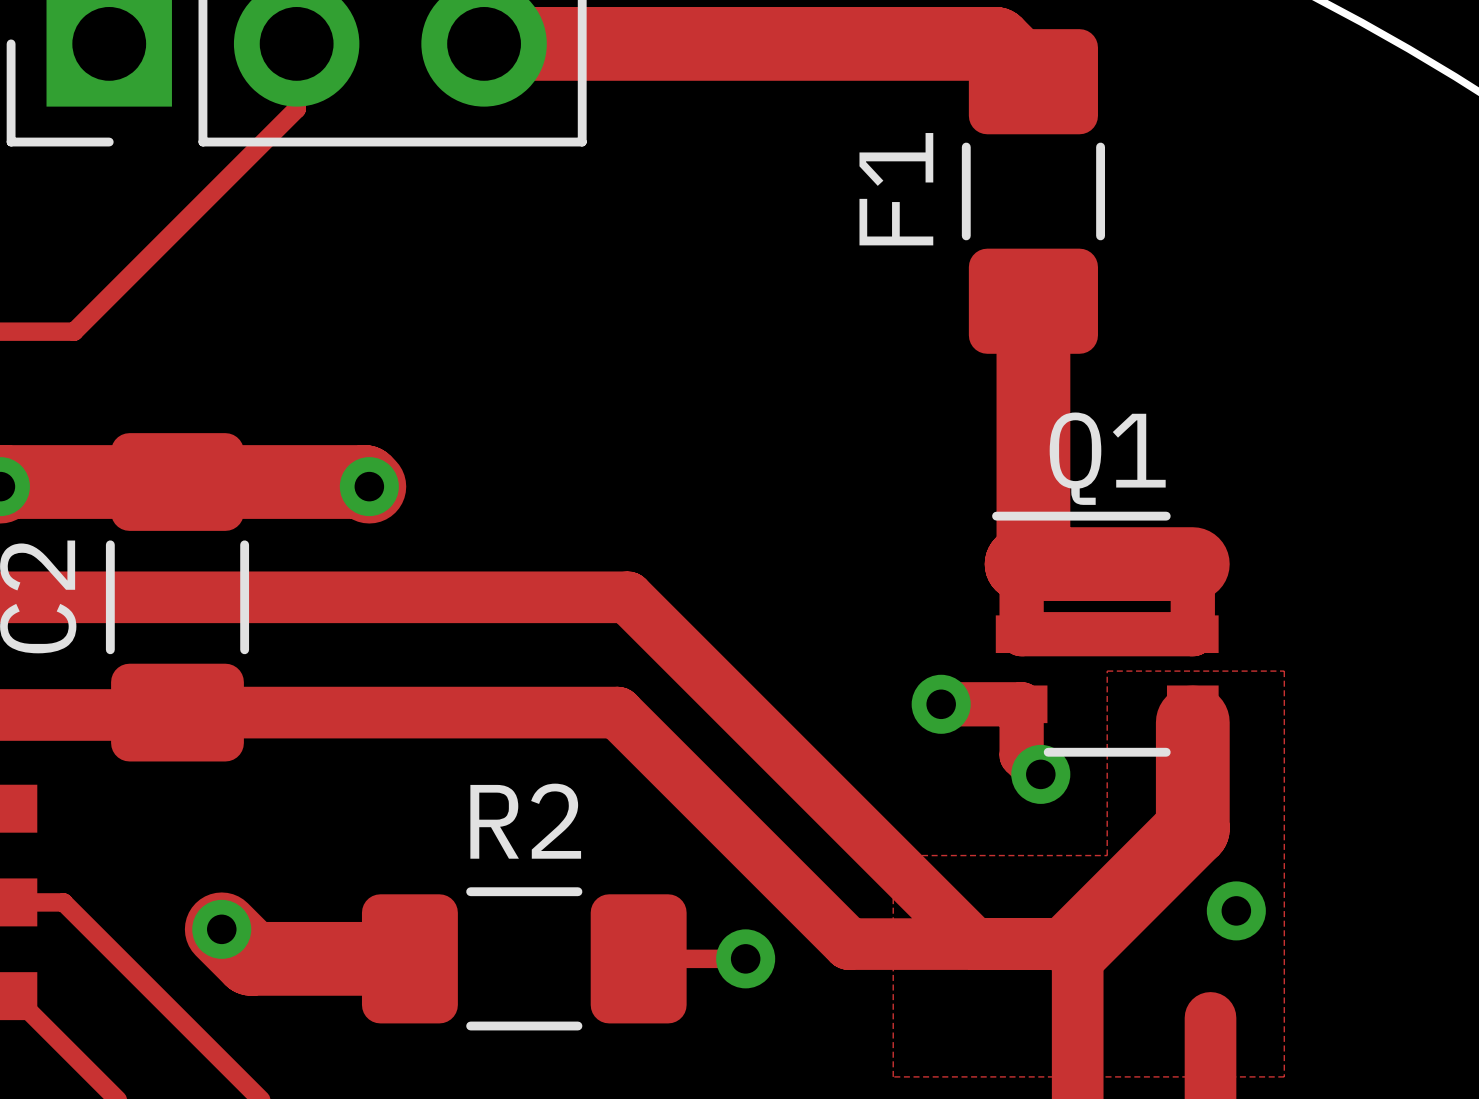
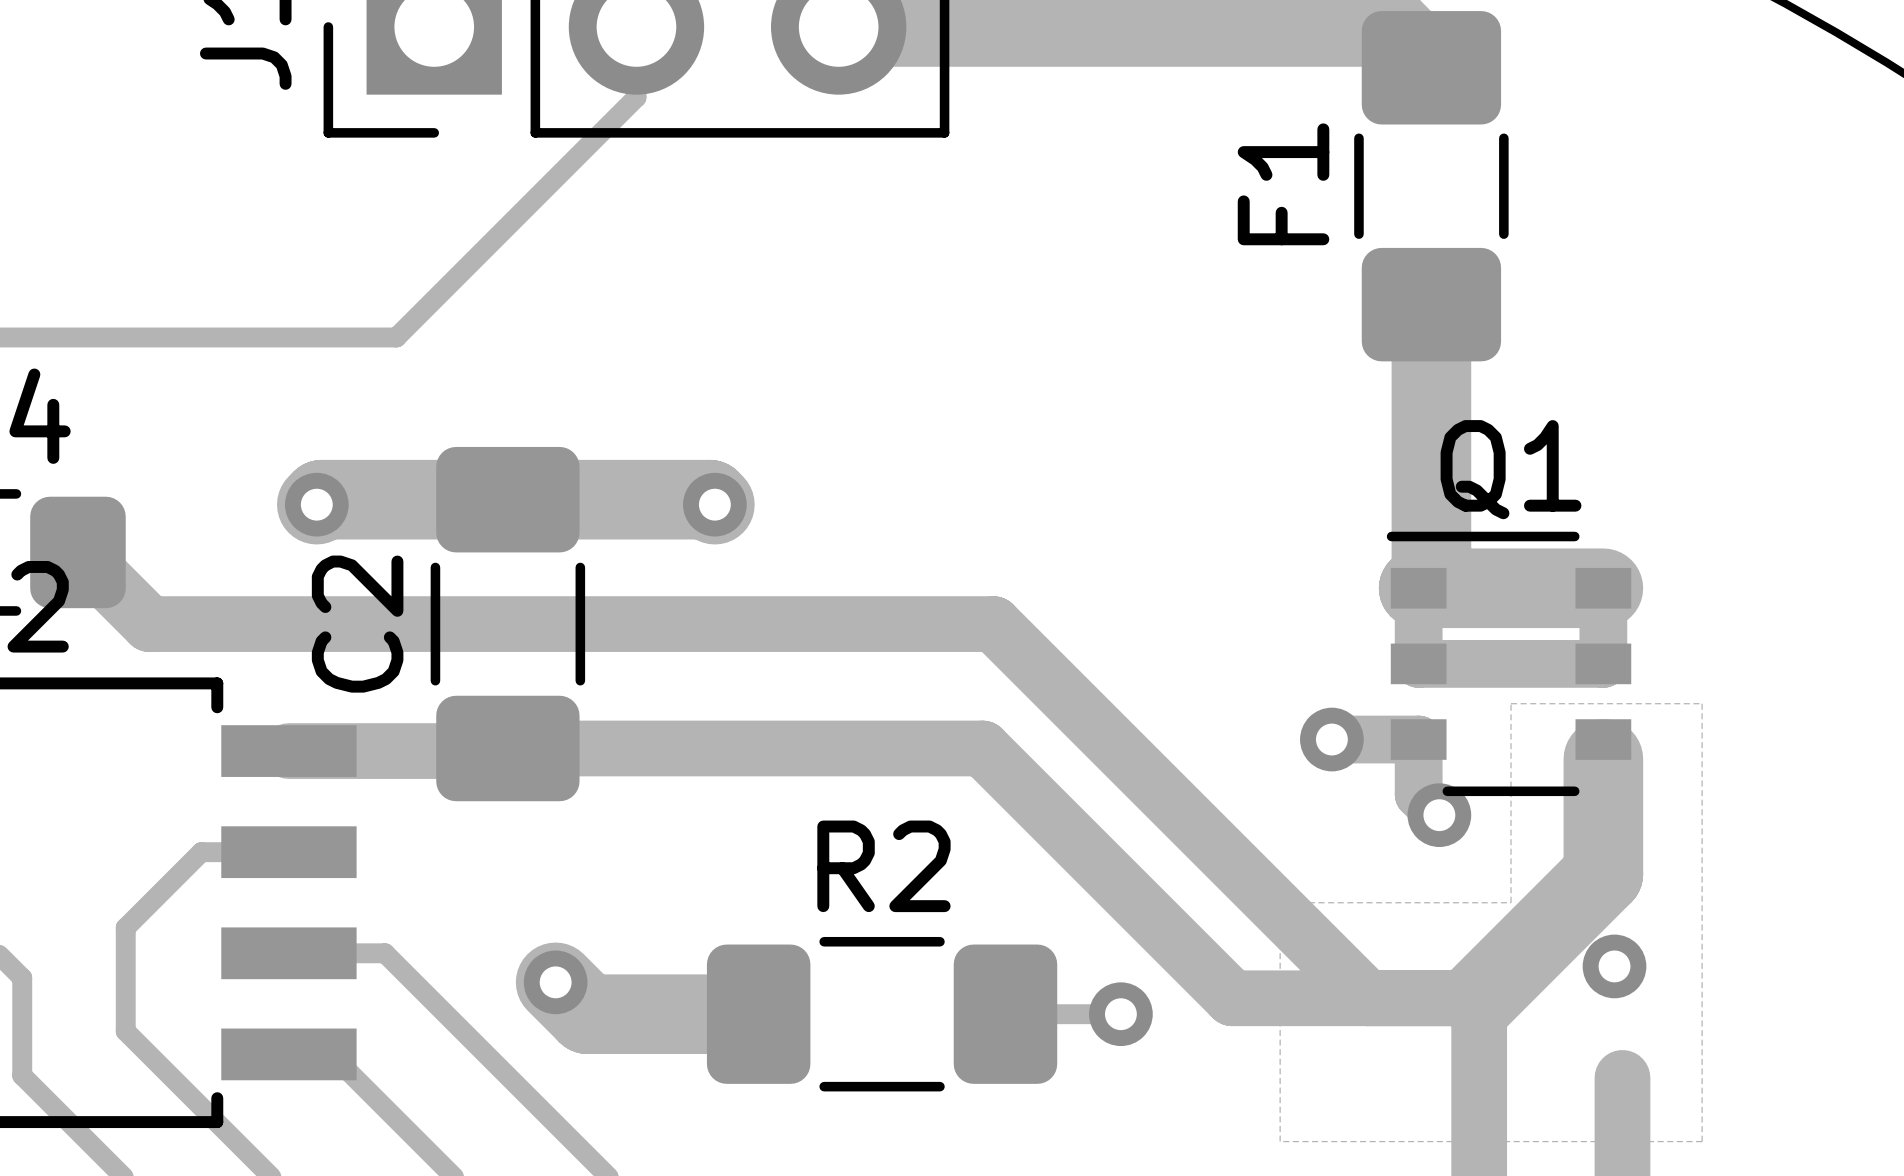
via position: (1236, 910) -> (1614, 966)

